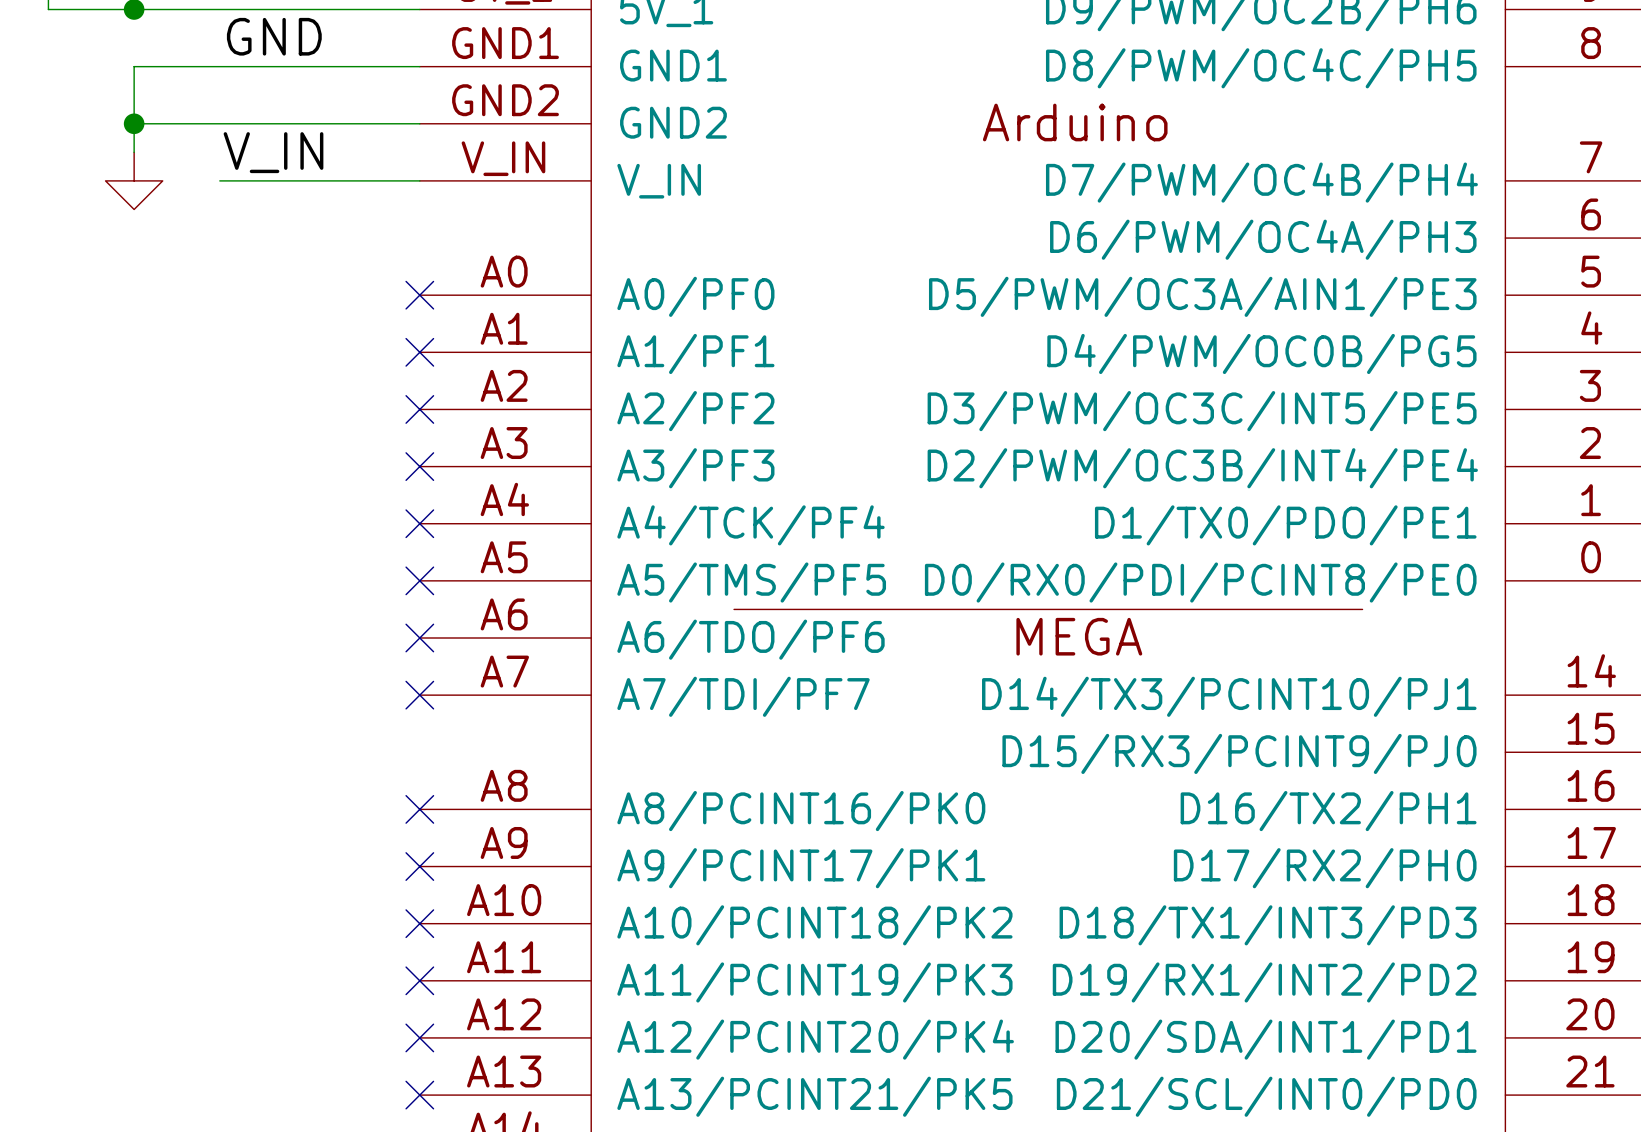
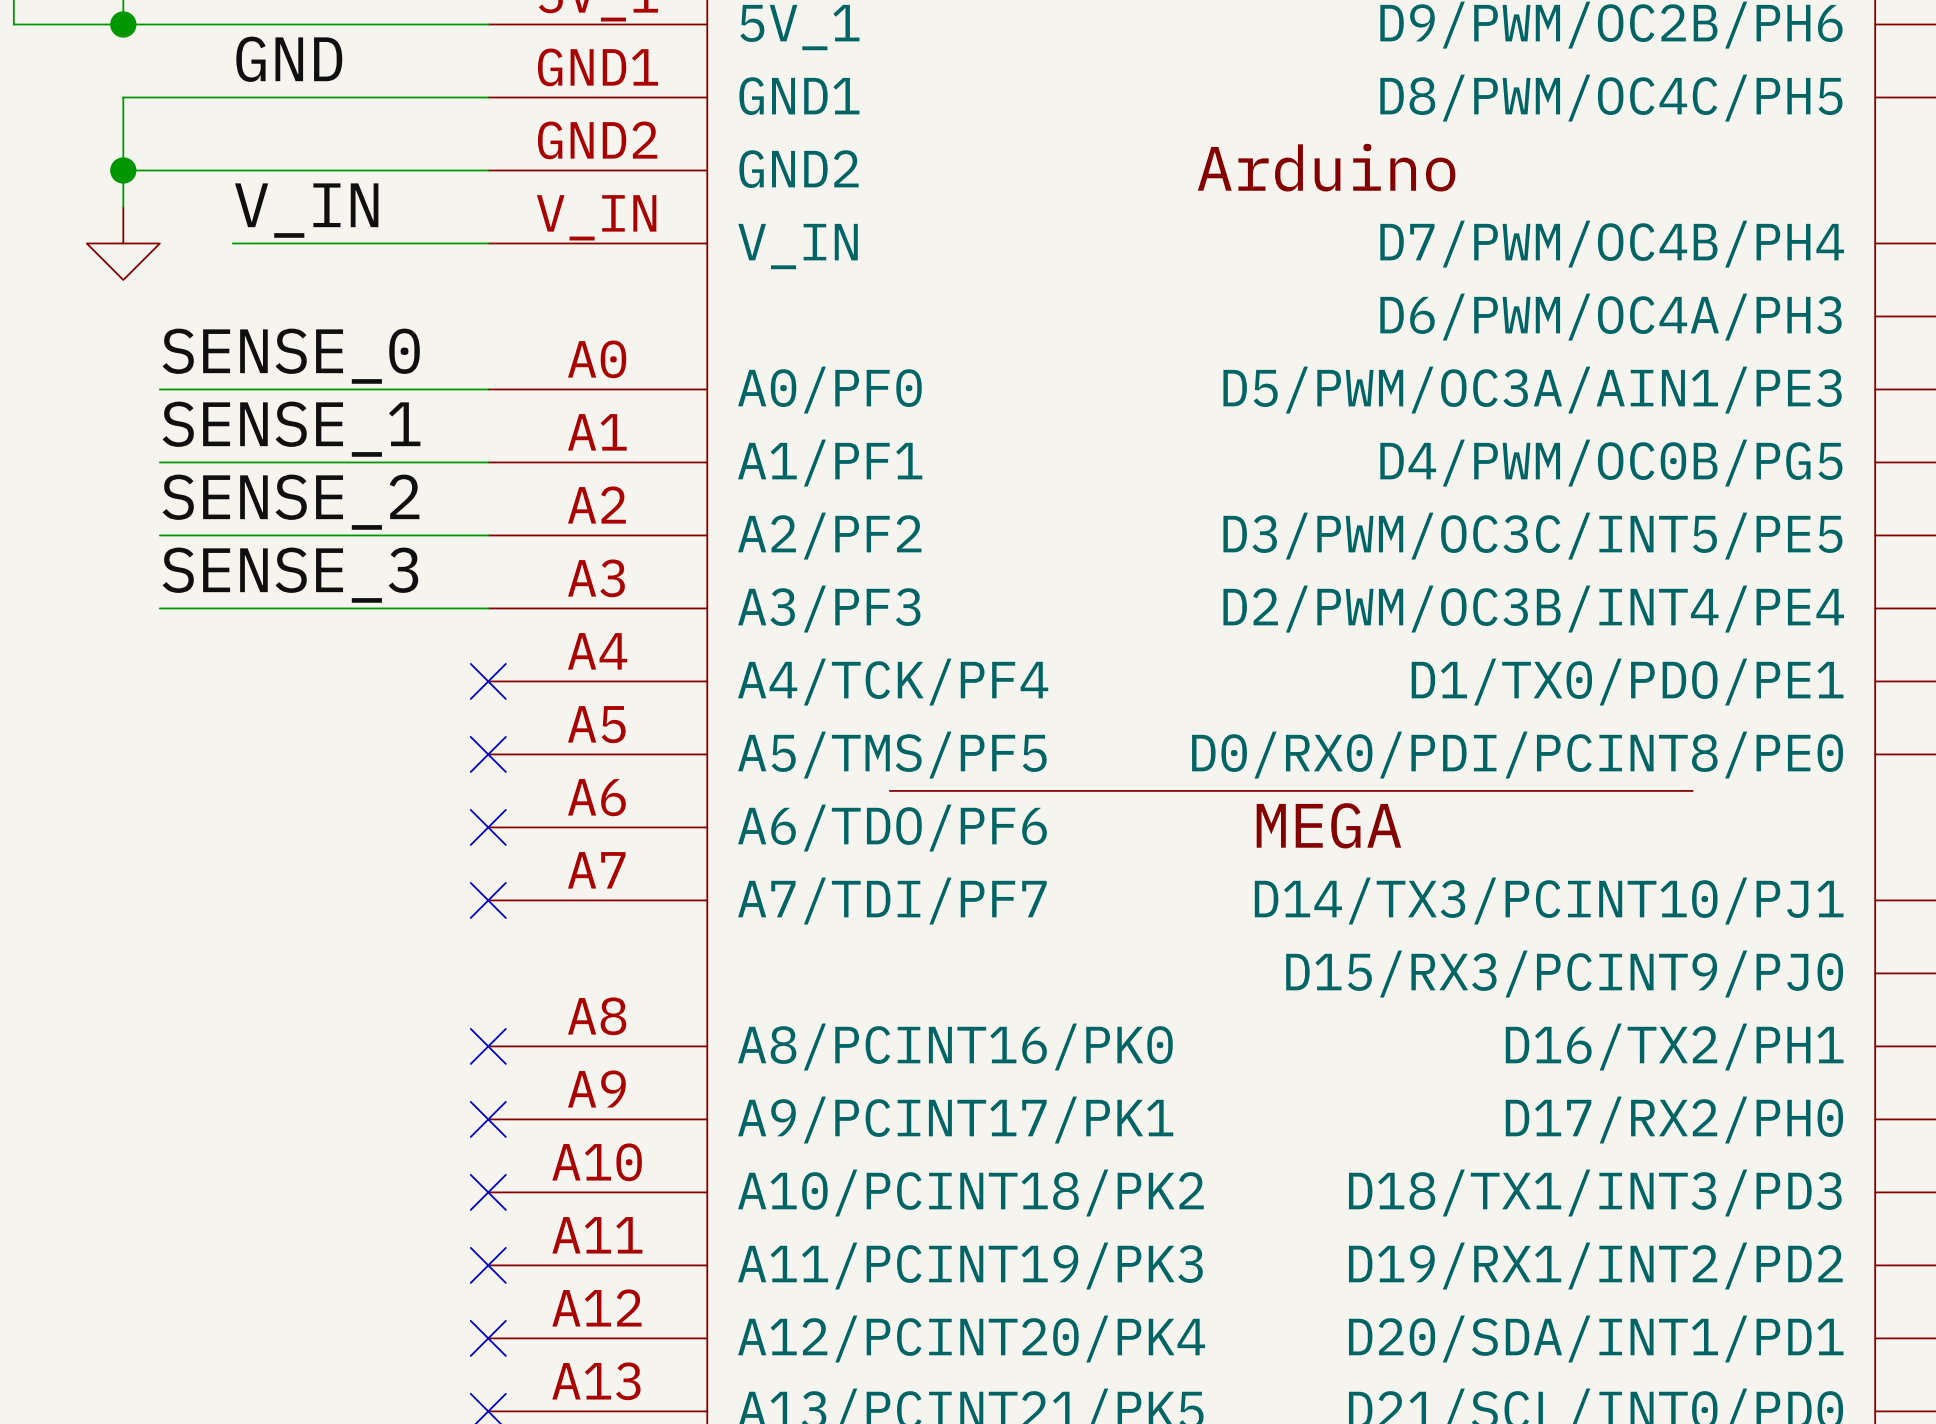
label: none -> SENSE_0 (291, 356)
wire: none -> (159, 389) (488, 389)
no-connect mark: (419, 295) -> none
label: none -> SENSE_1 (291, 429)
wire: none -> (159, 462) (488, 462)
no-connect mark: (419, 352) -> none
label: none -> SENSE_2 (291, 502)
wire: none -> (159, 535) (488, 535)
no-connect mark: (419, 409) -> none
label: none -> SENSE_3 (290, 575)
wire: none -> (159, 608) (488, 608)
no-connect mark: (419, 466) -> none

